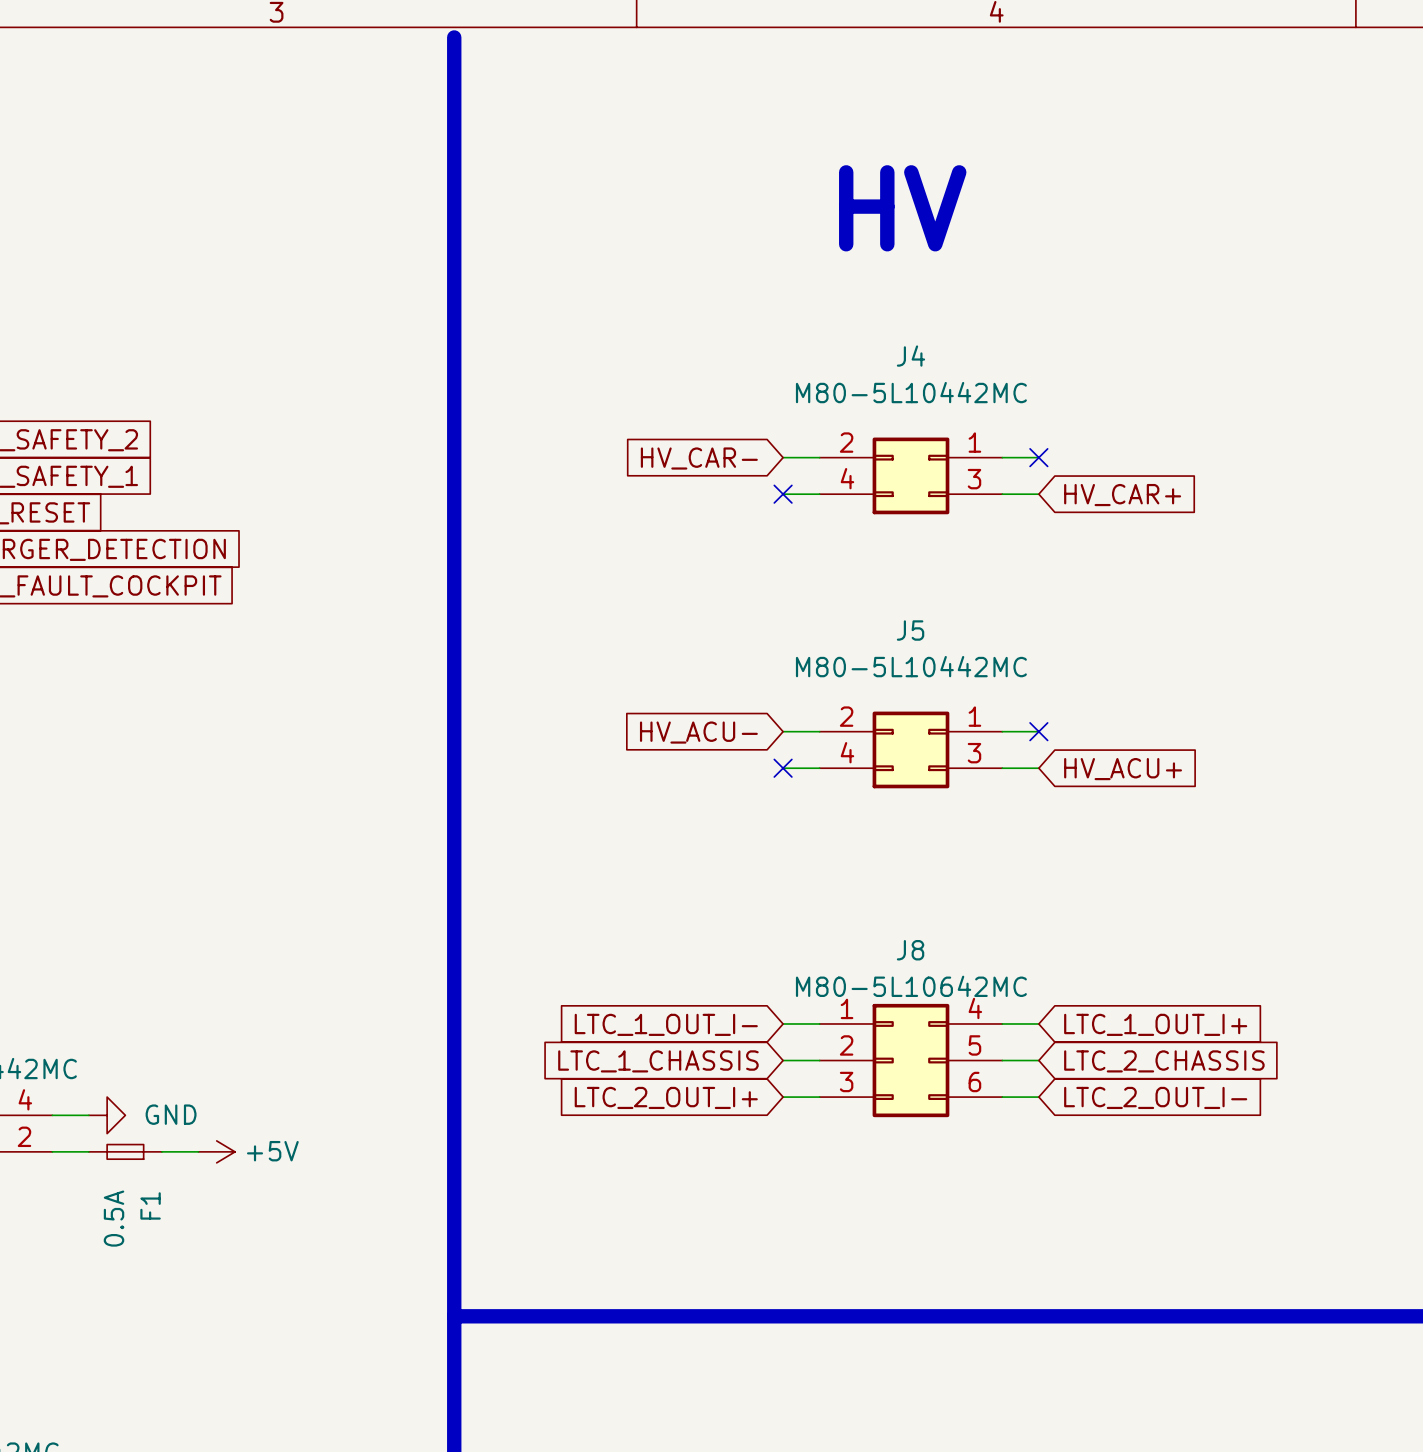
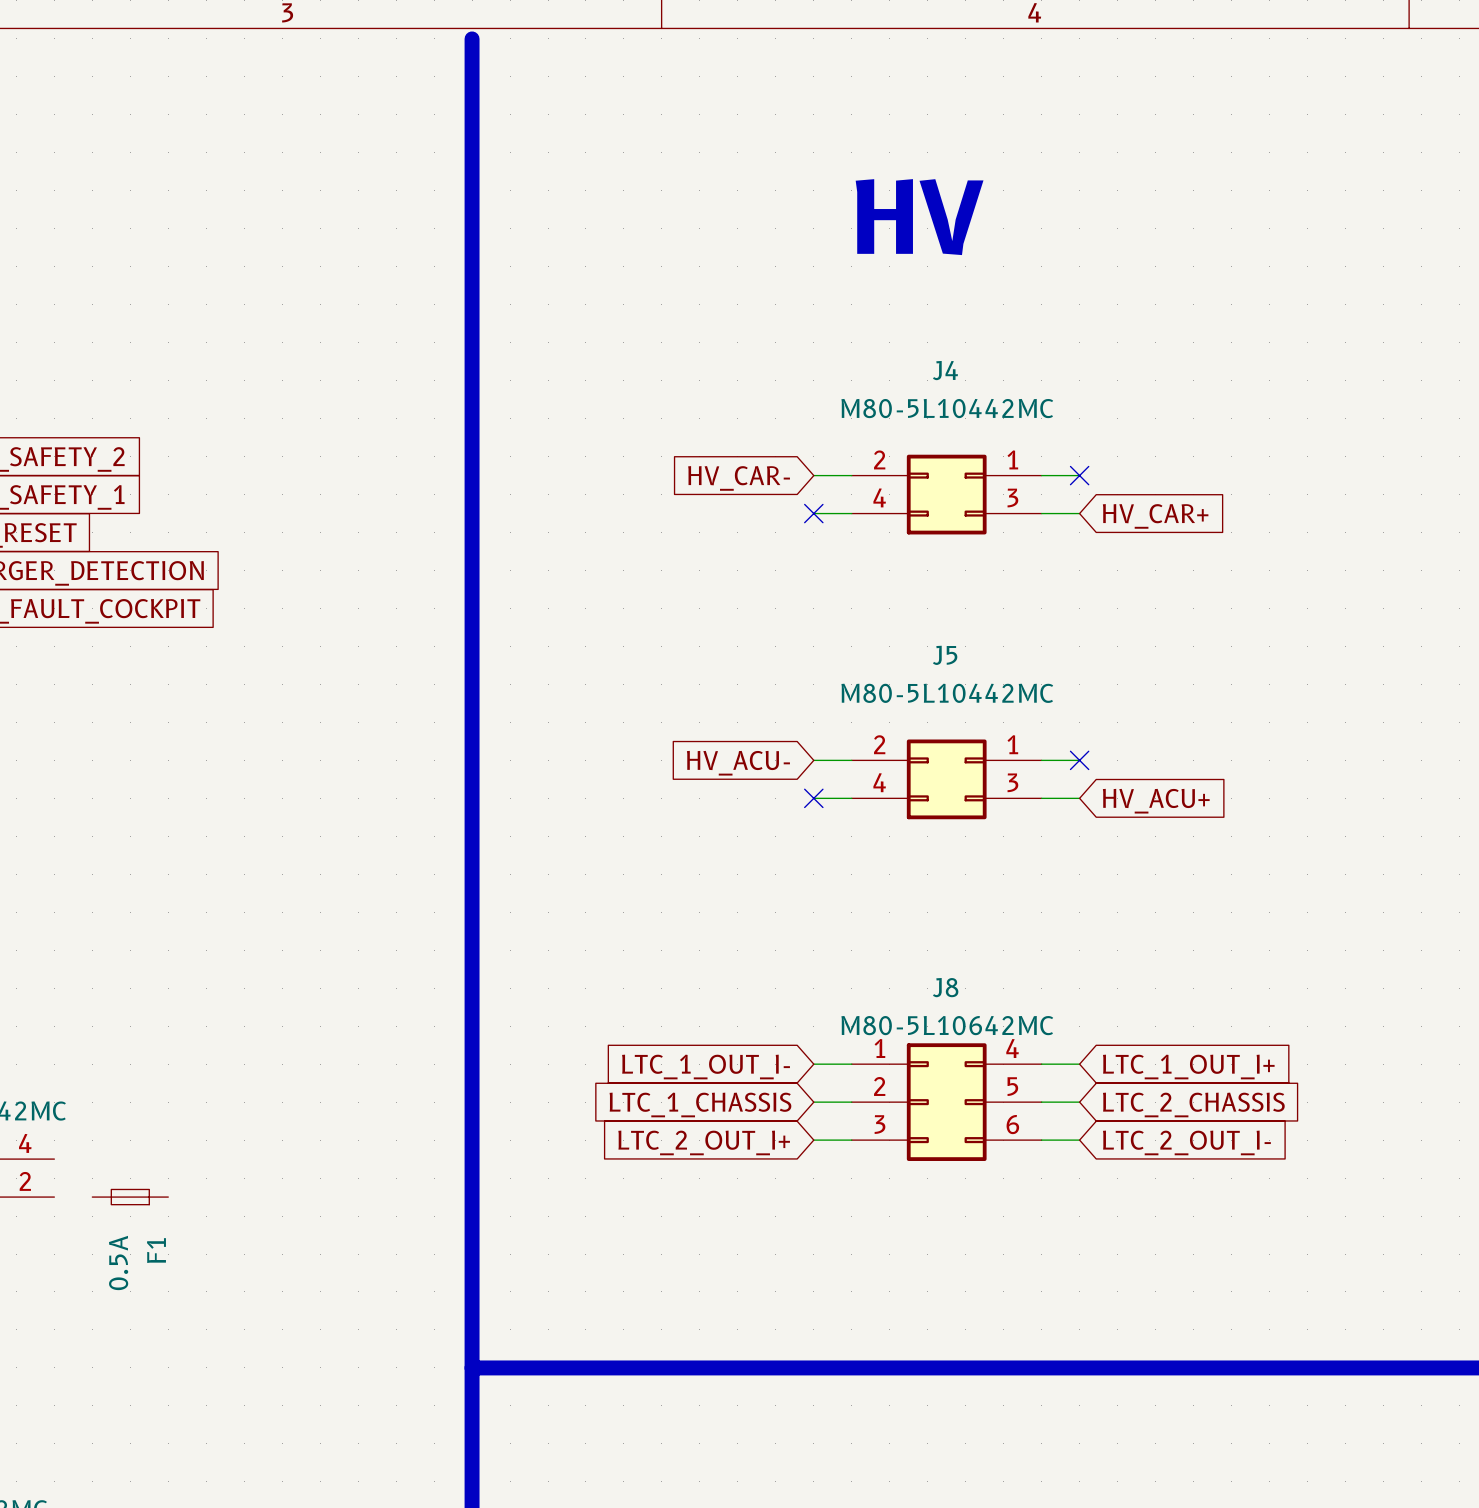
wire: (52, 1115) (88, 1115) -> none
power symbol: GND (107, 1115) -> none
wire: (52, 1151) (88, 1151) -> none
wire: (161, 1151) (198, 1151) -> none
power symbol: +5V (216, 1151) -> none

